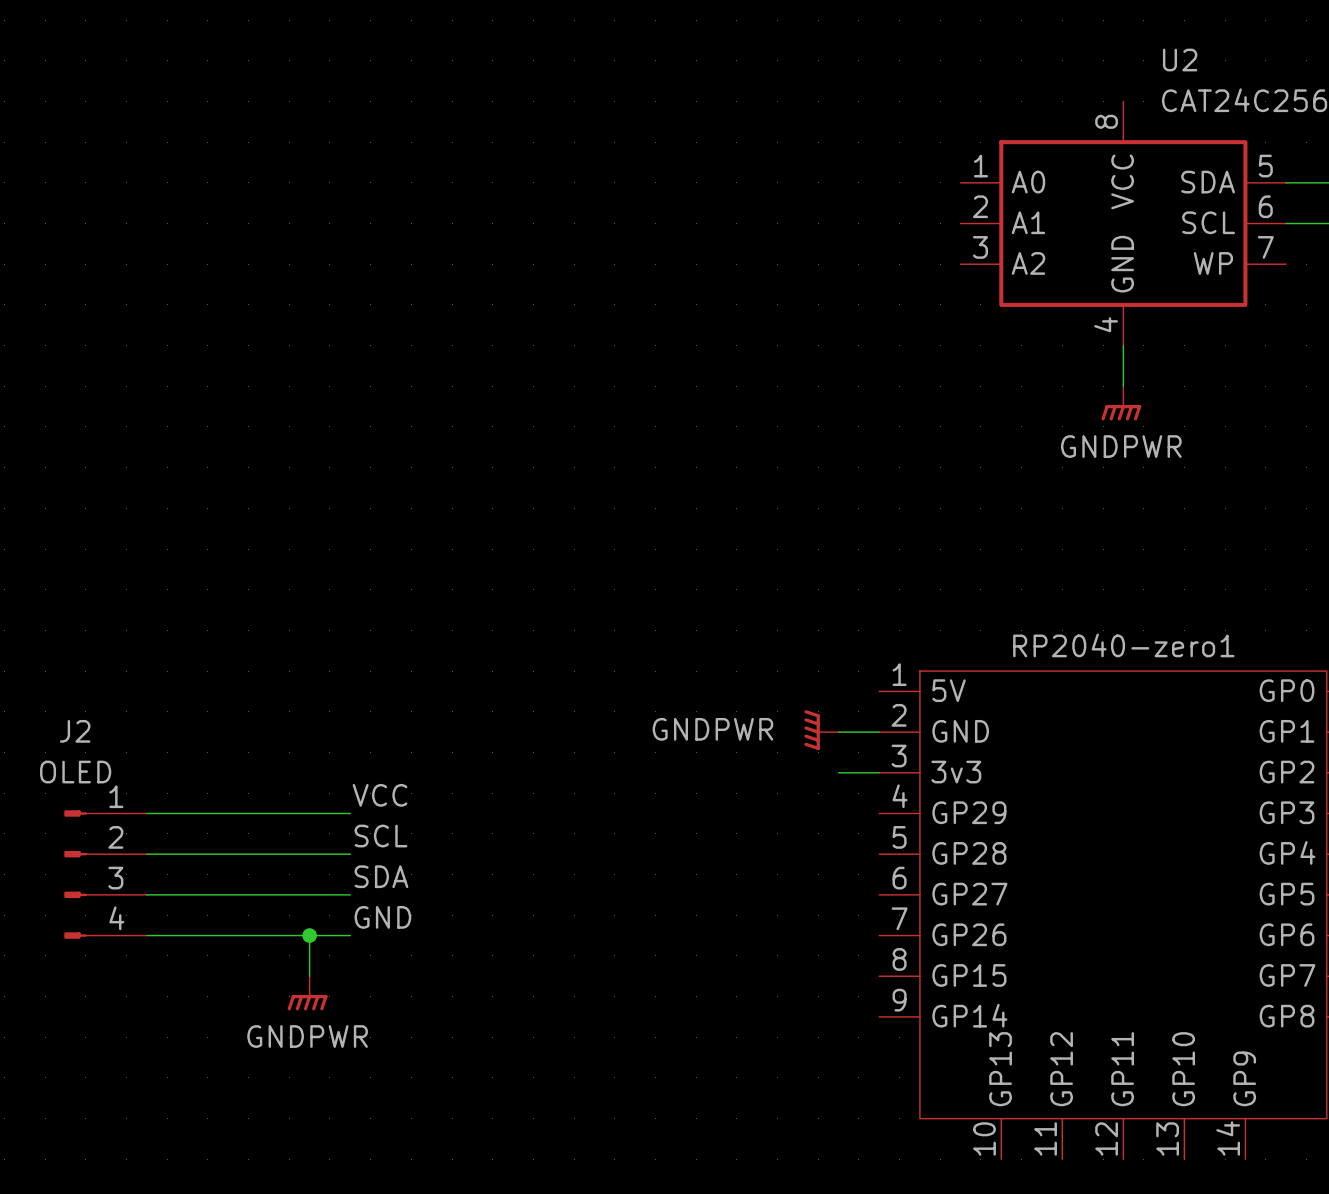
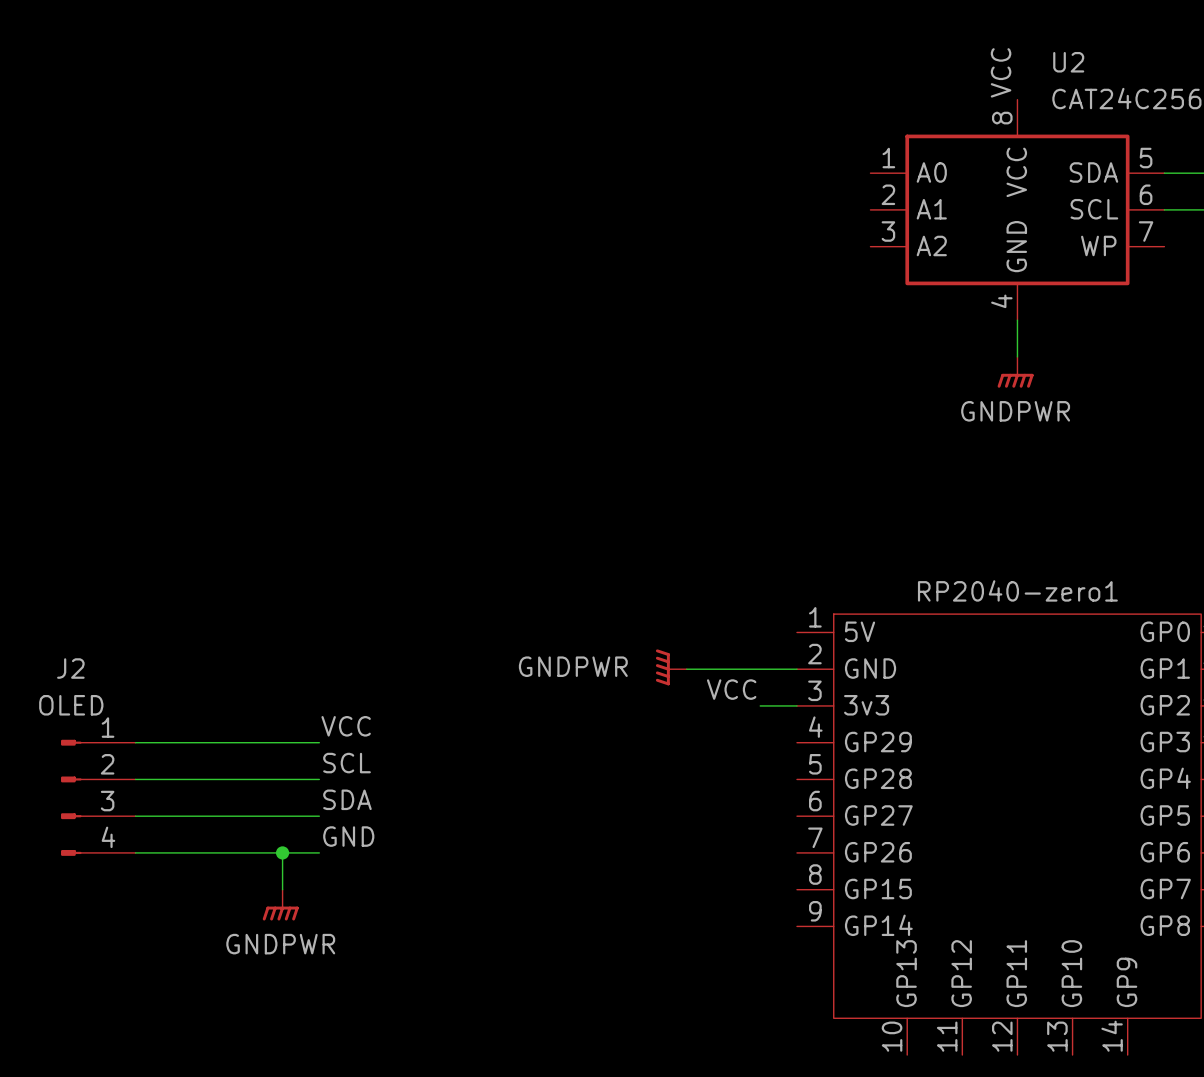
label: none -> VCC (1001, 72)
power symbol position: GNDPWR (821, 730) -> GNDPWR (671, 667)
wire: none -> (686, 669) (760, 669)
label: none -> VCC (731, 689)

